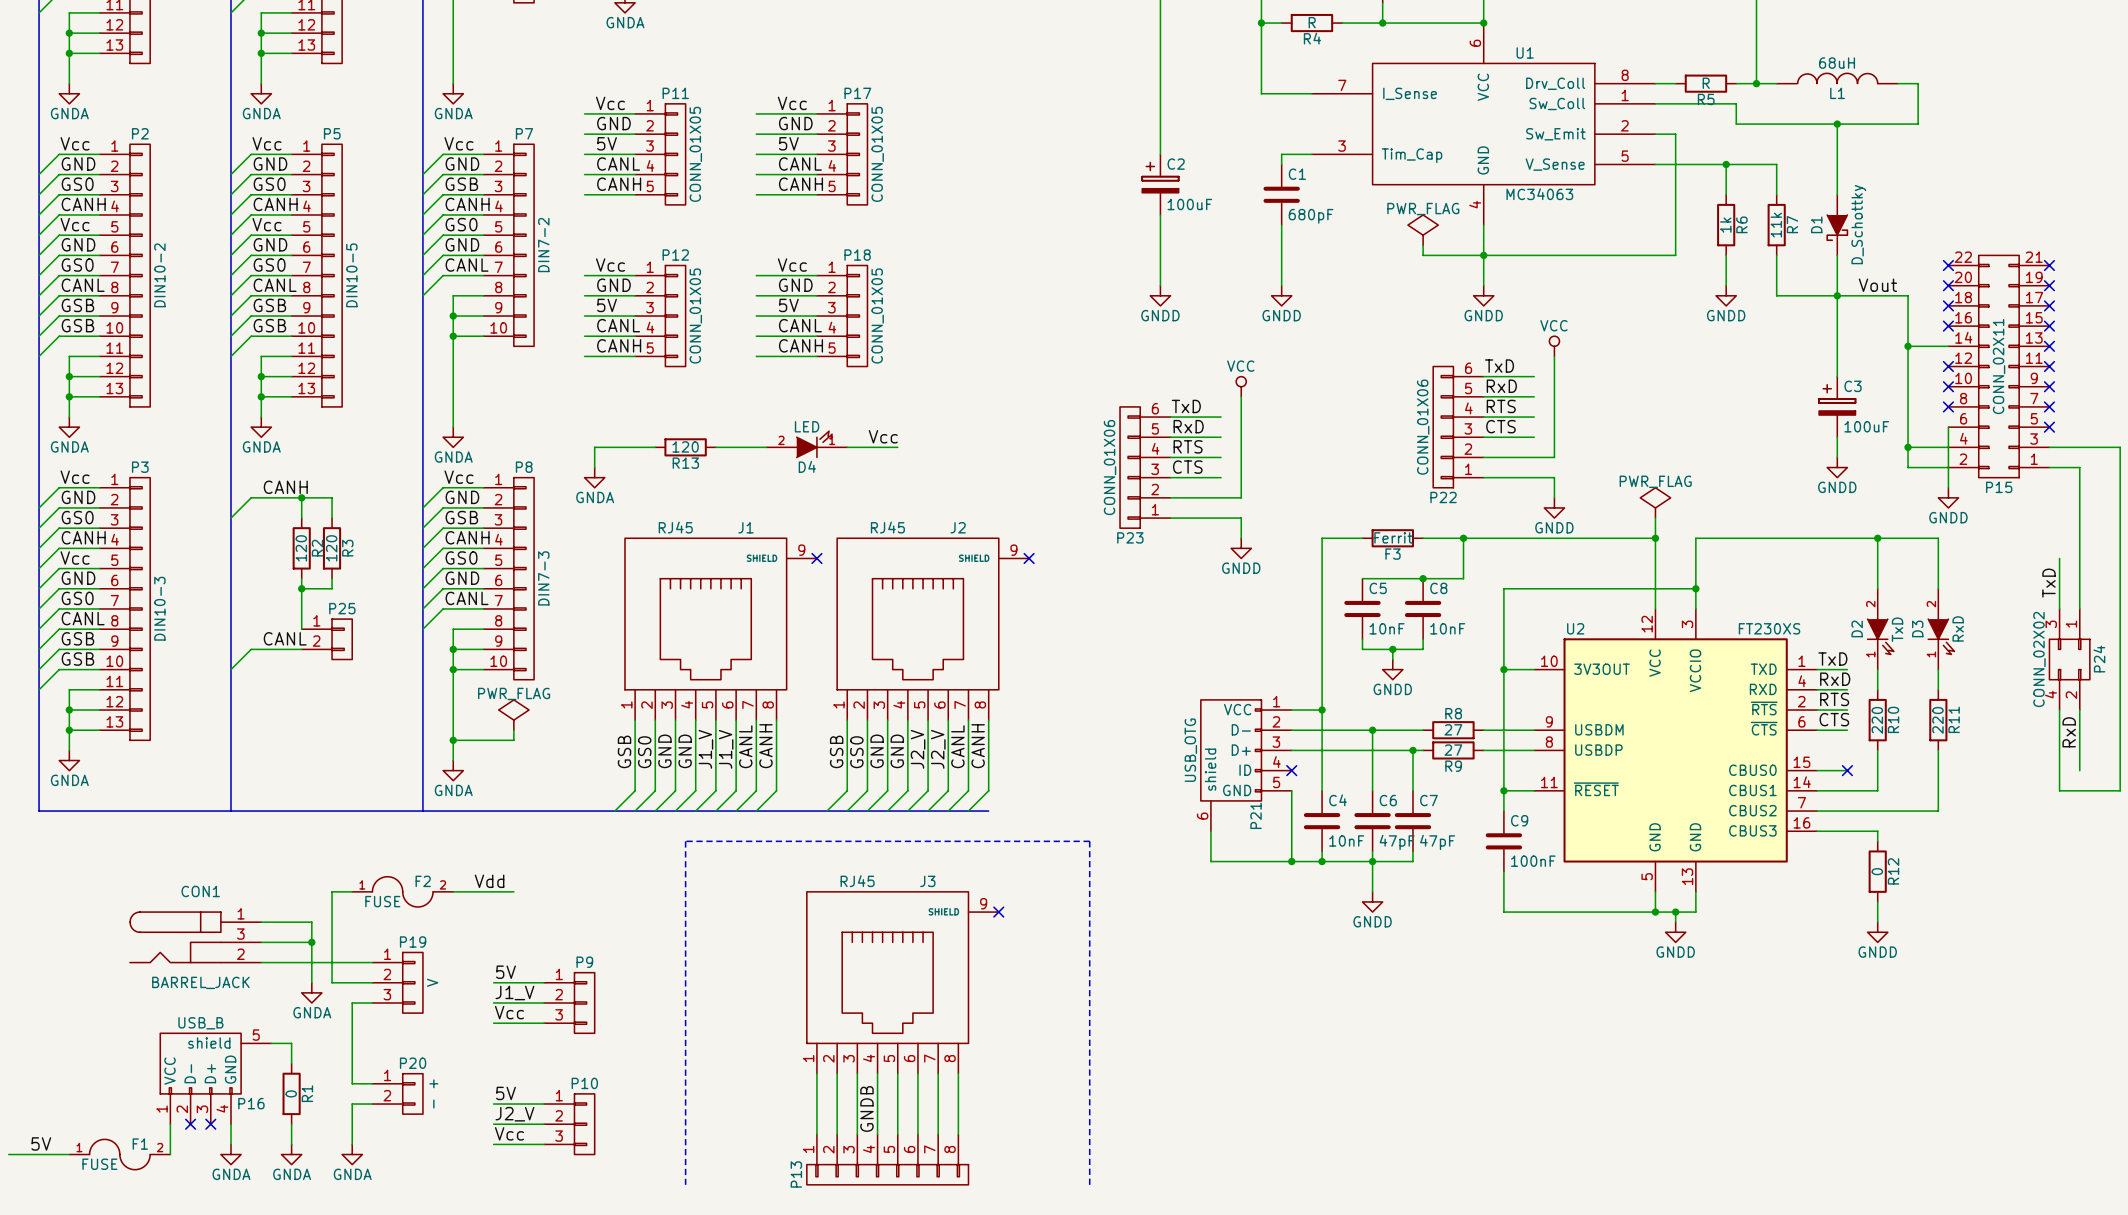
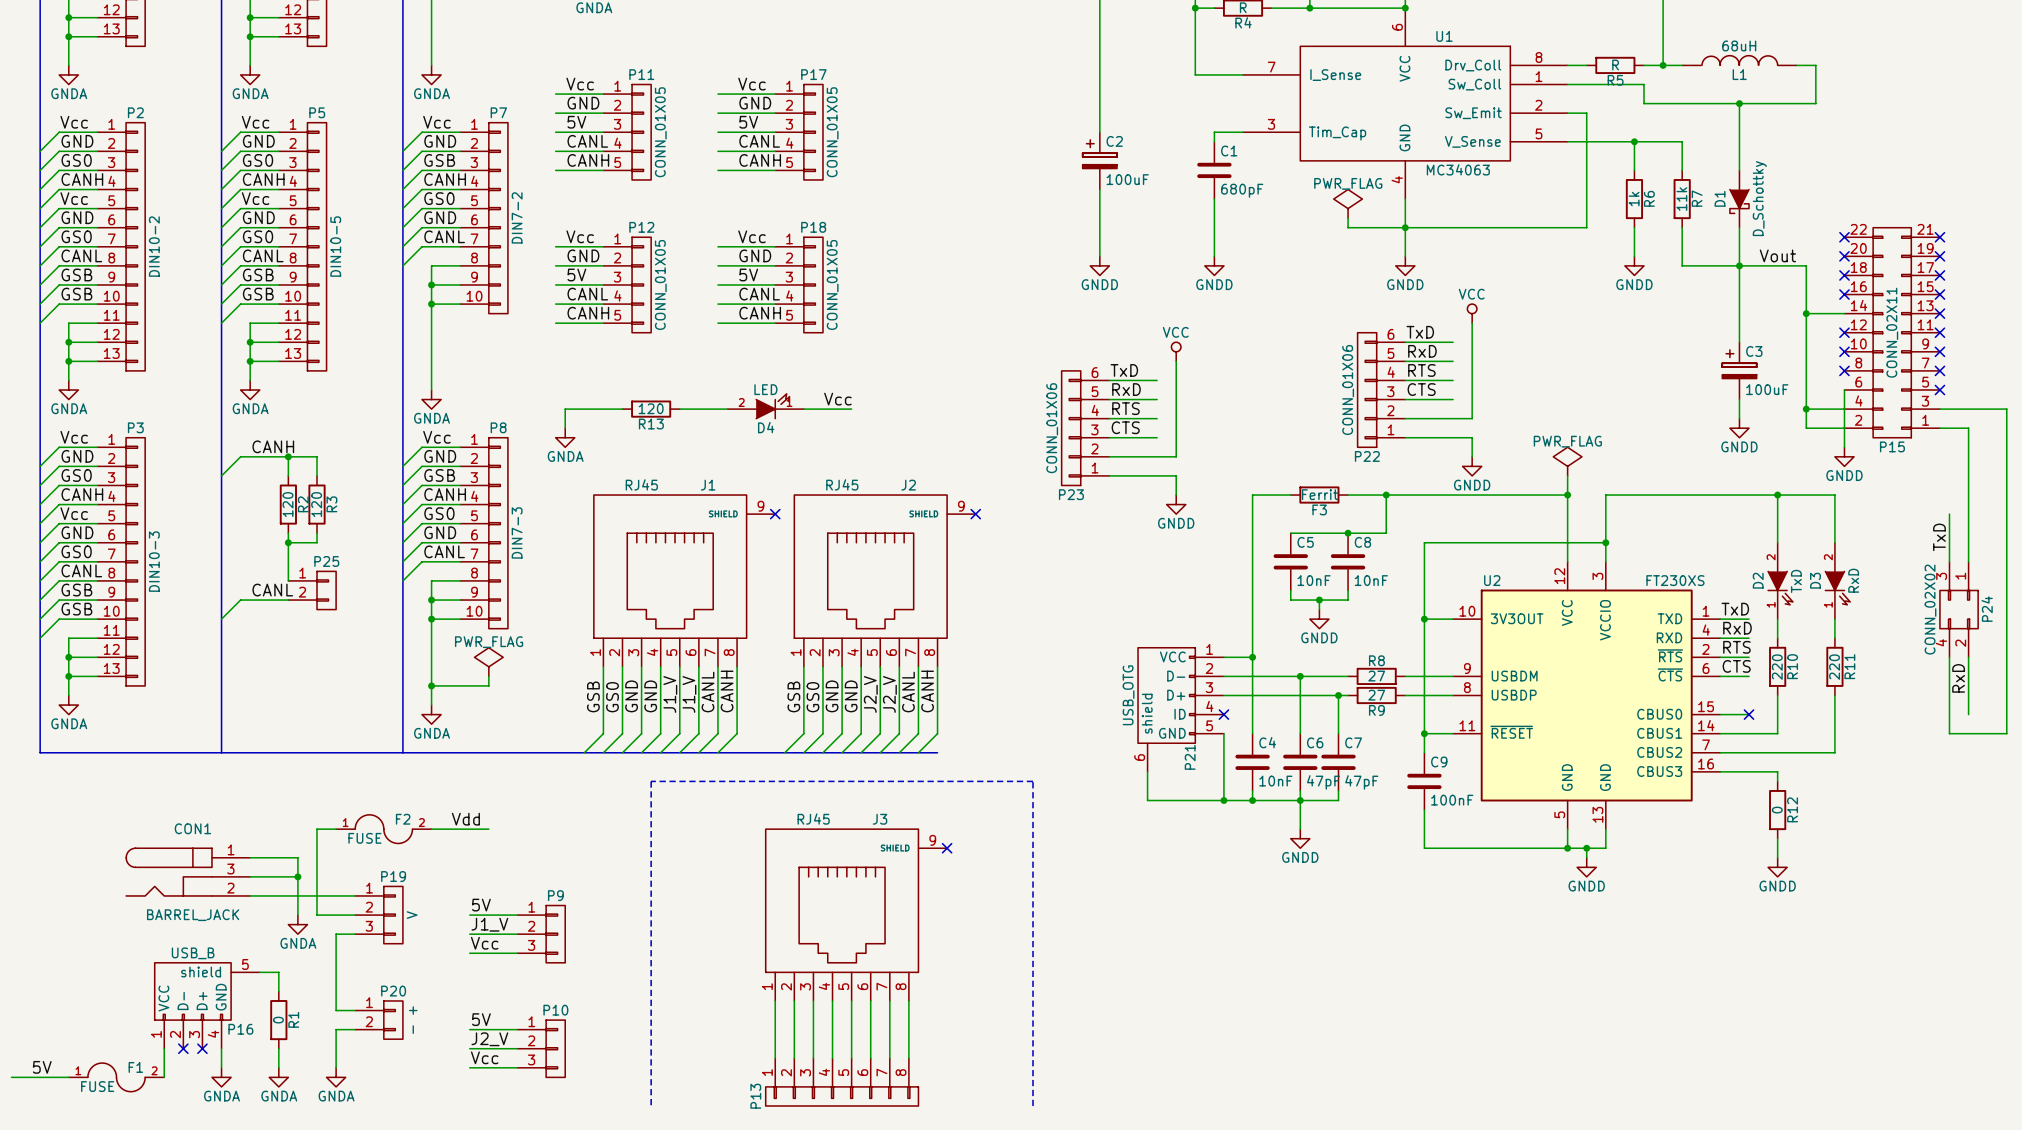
label: GNDB (866, 1108) -> none

